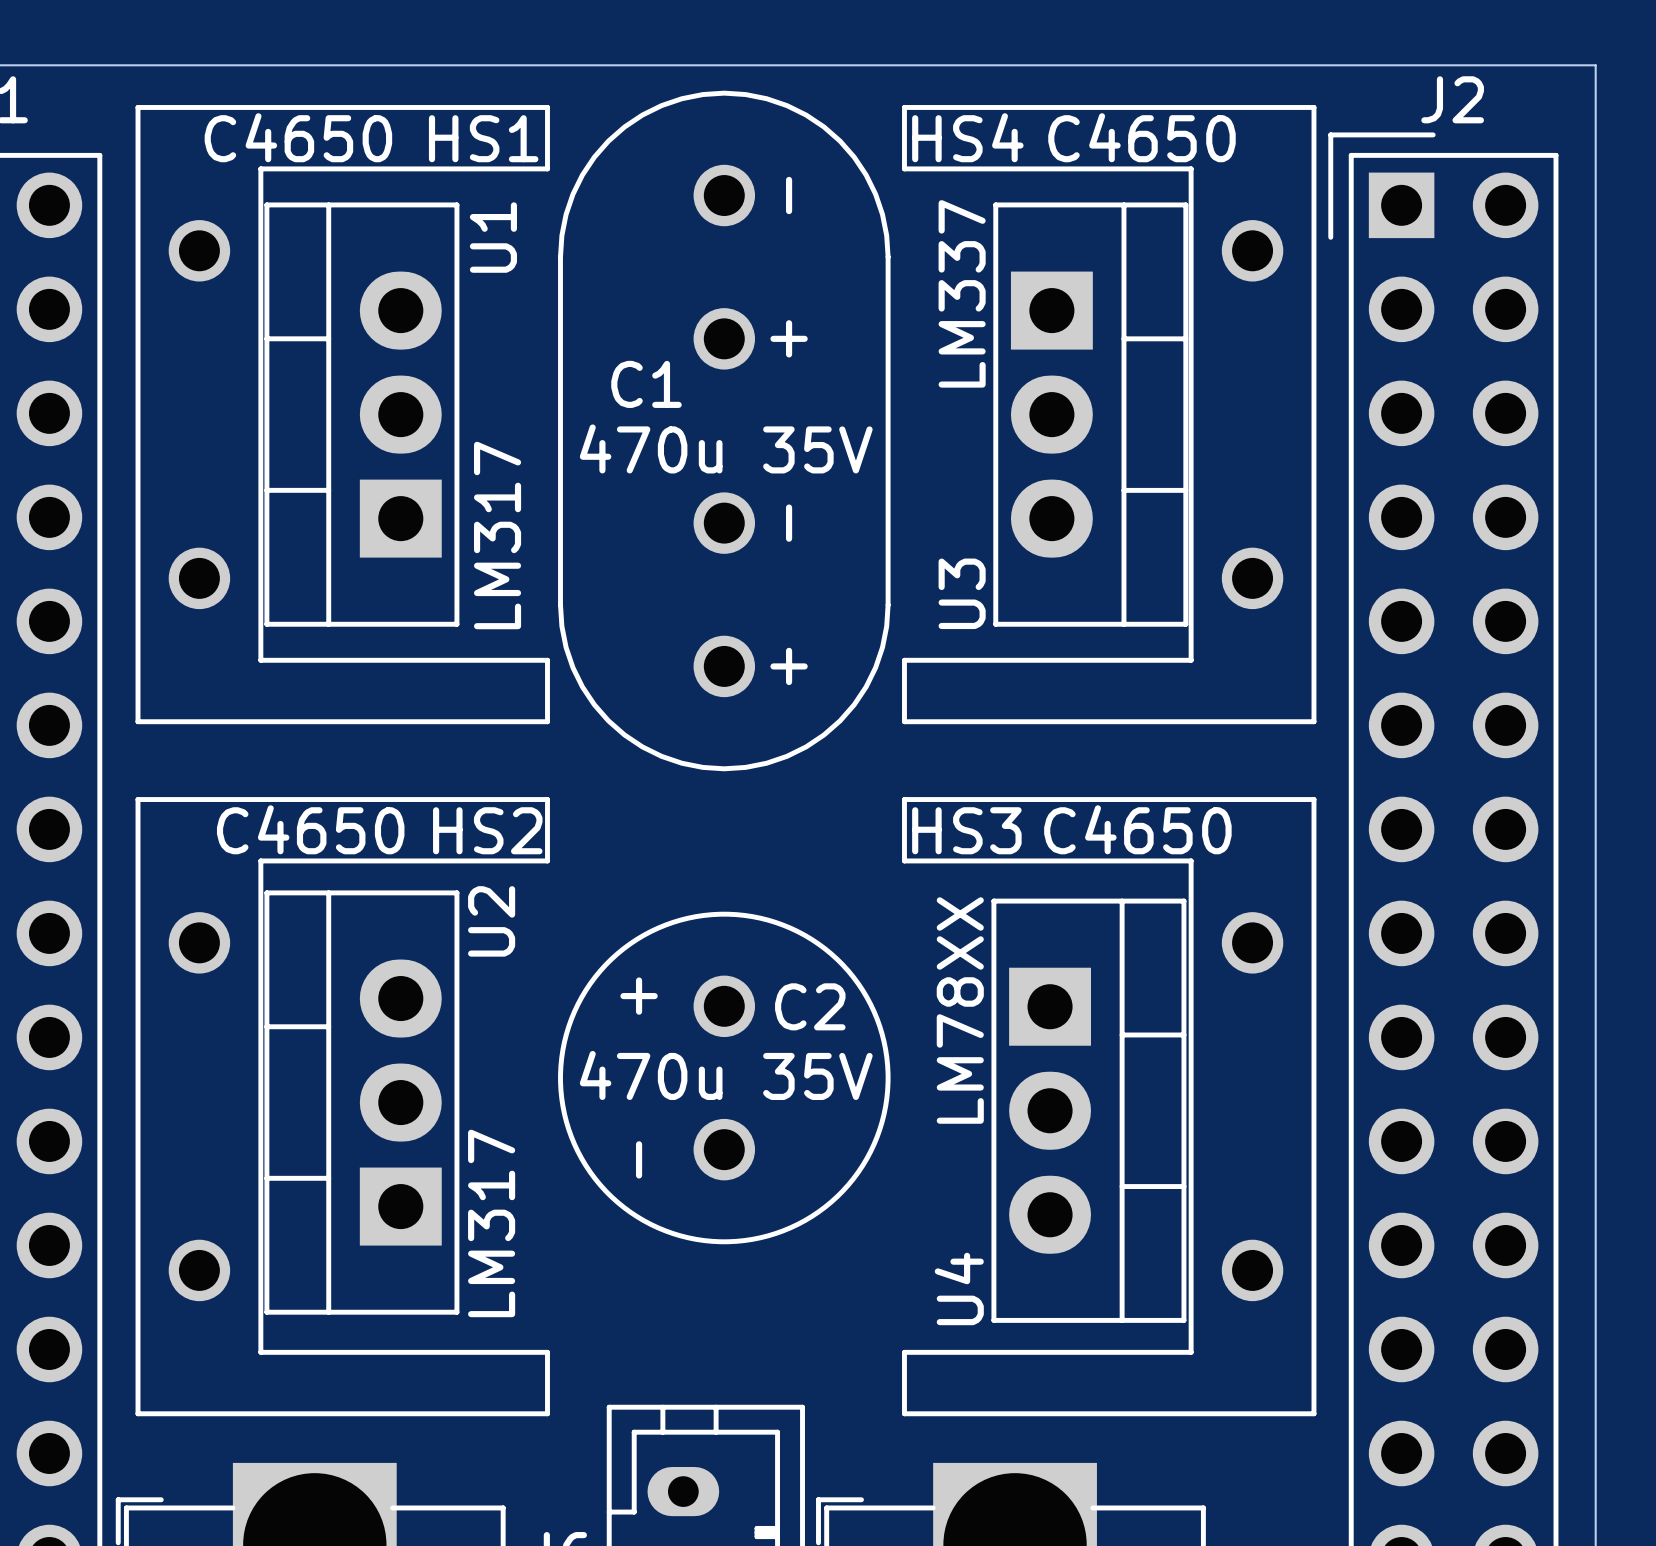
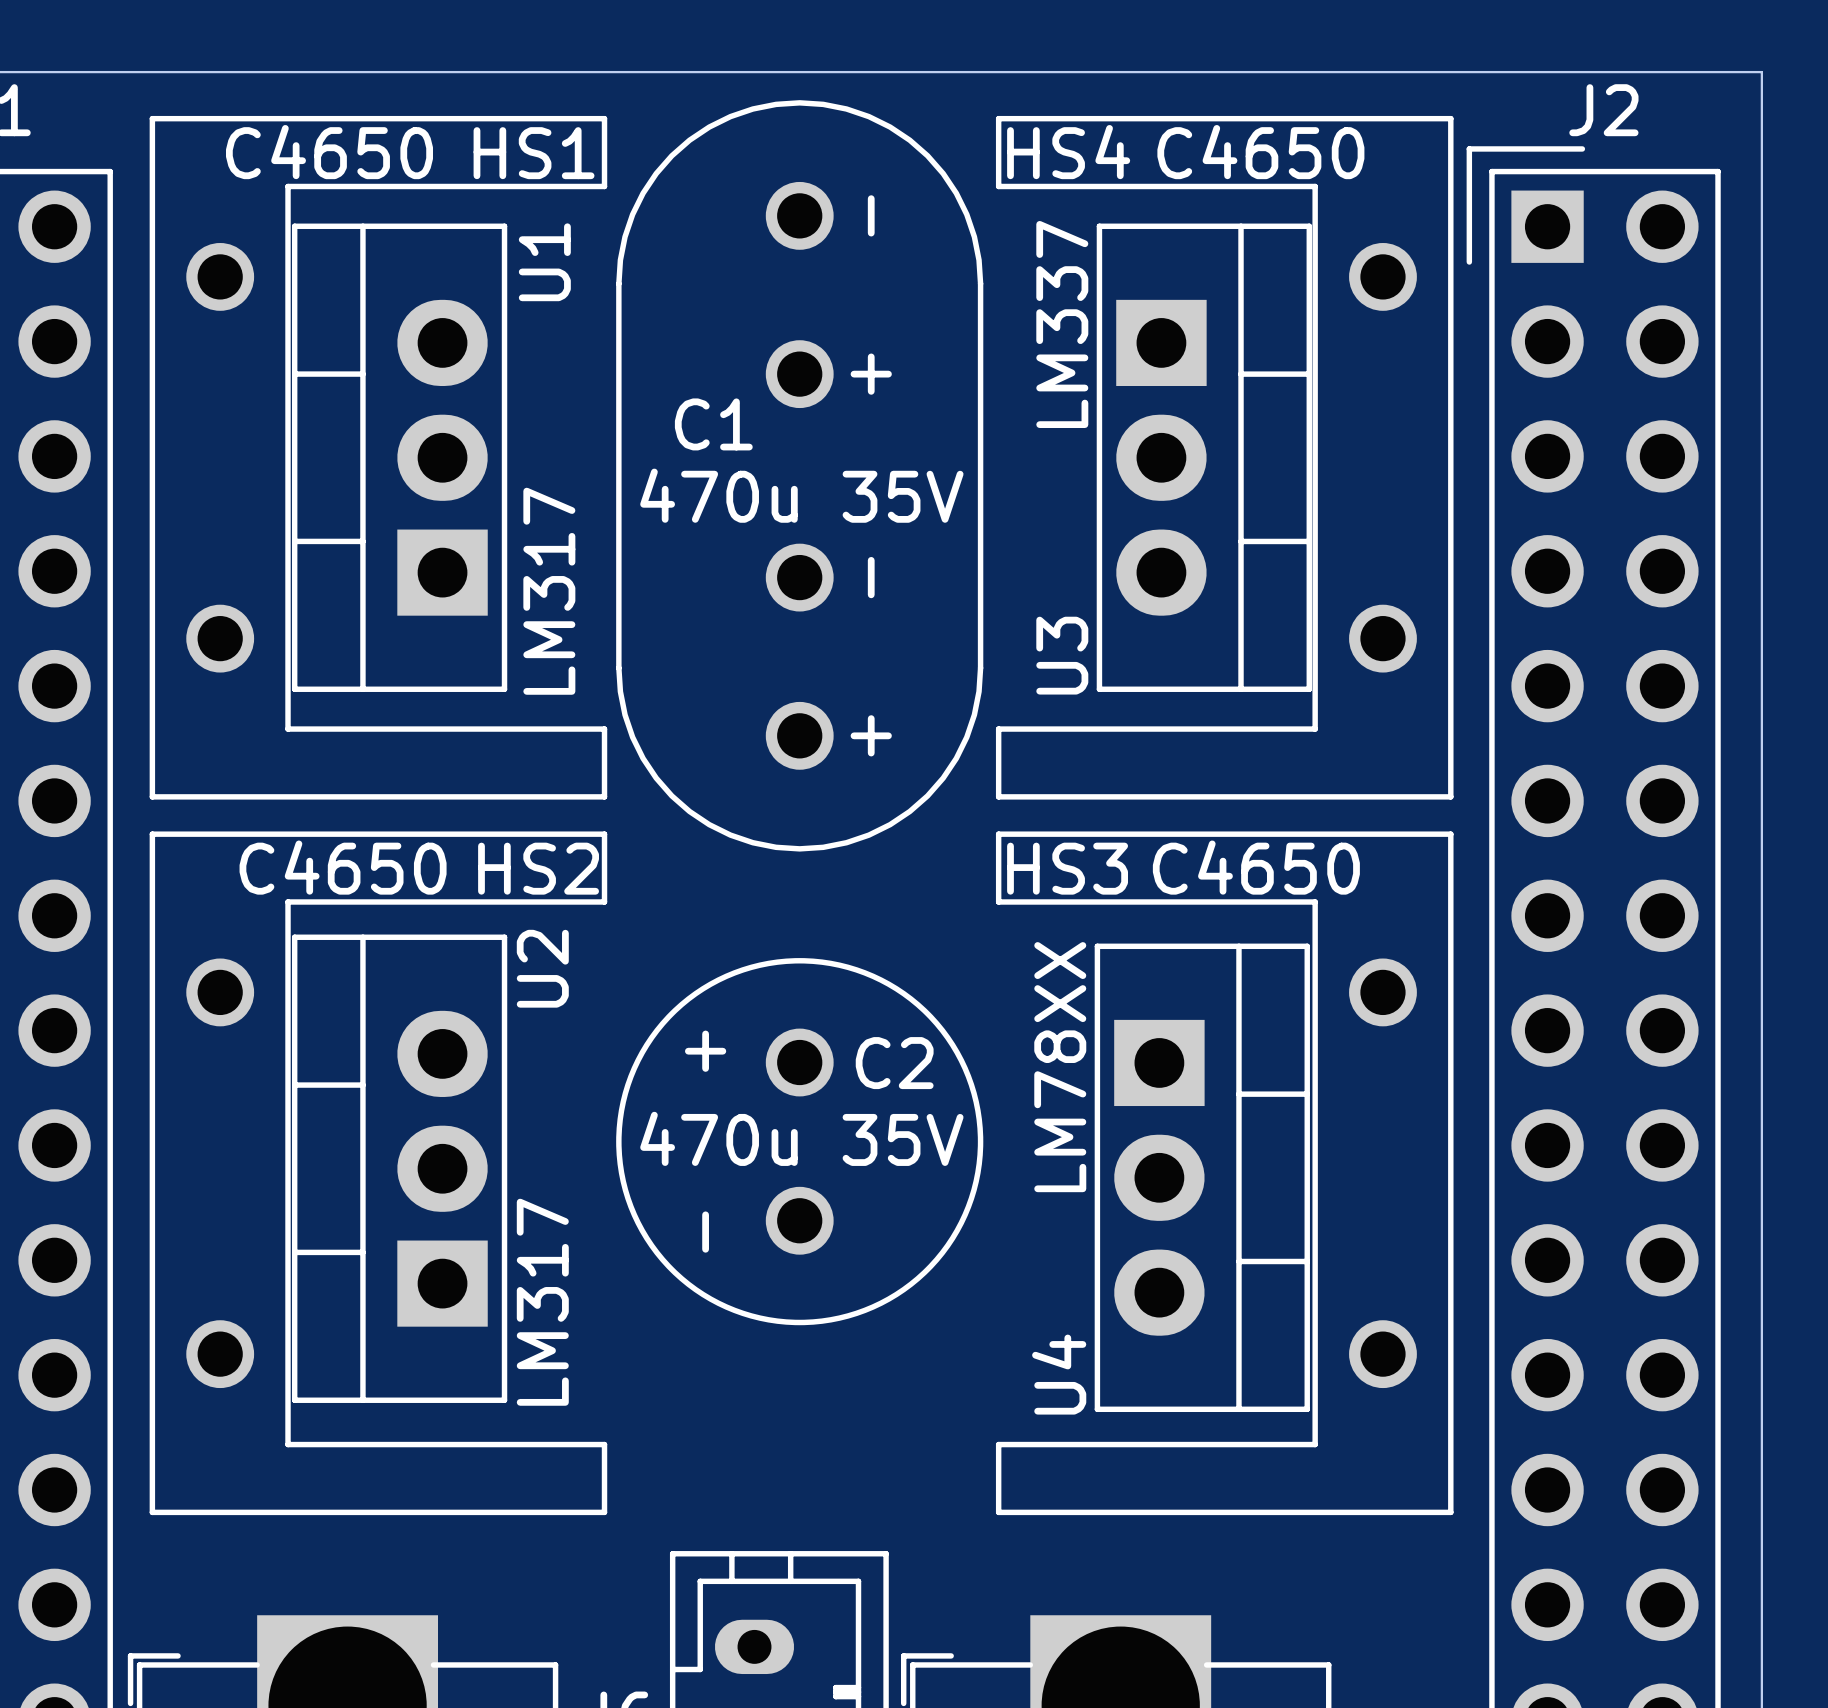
C2 position: (724, 1077) -> (799, 1141)
U2 position: (361, 1102) -> (399, 1168)
HS2 position: (342, 1106) -> (378, 1173)
HS3 position: (1109, 1106) -> (1224, 1173)
U4 position: (1088, 1110) -> (1202, 1177)

